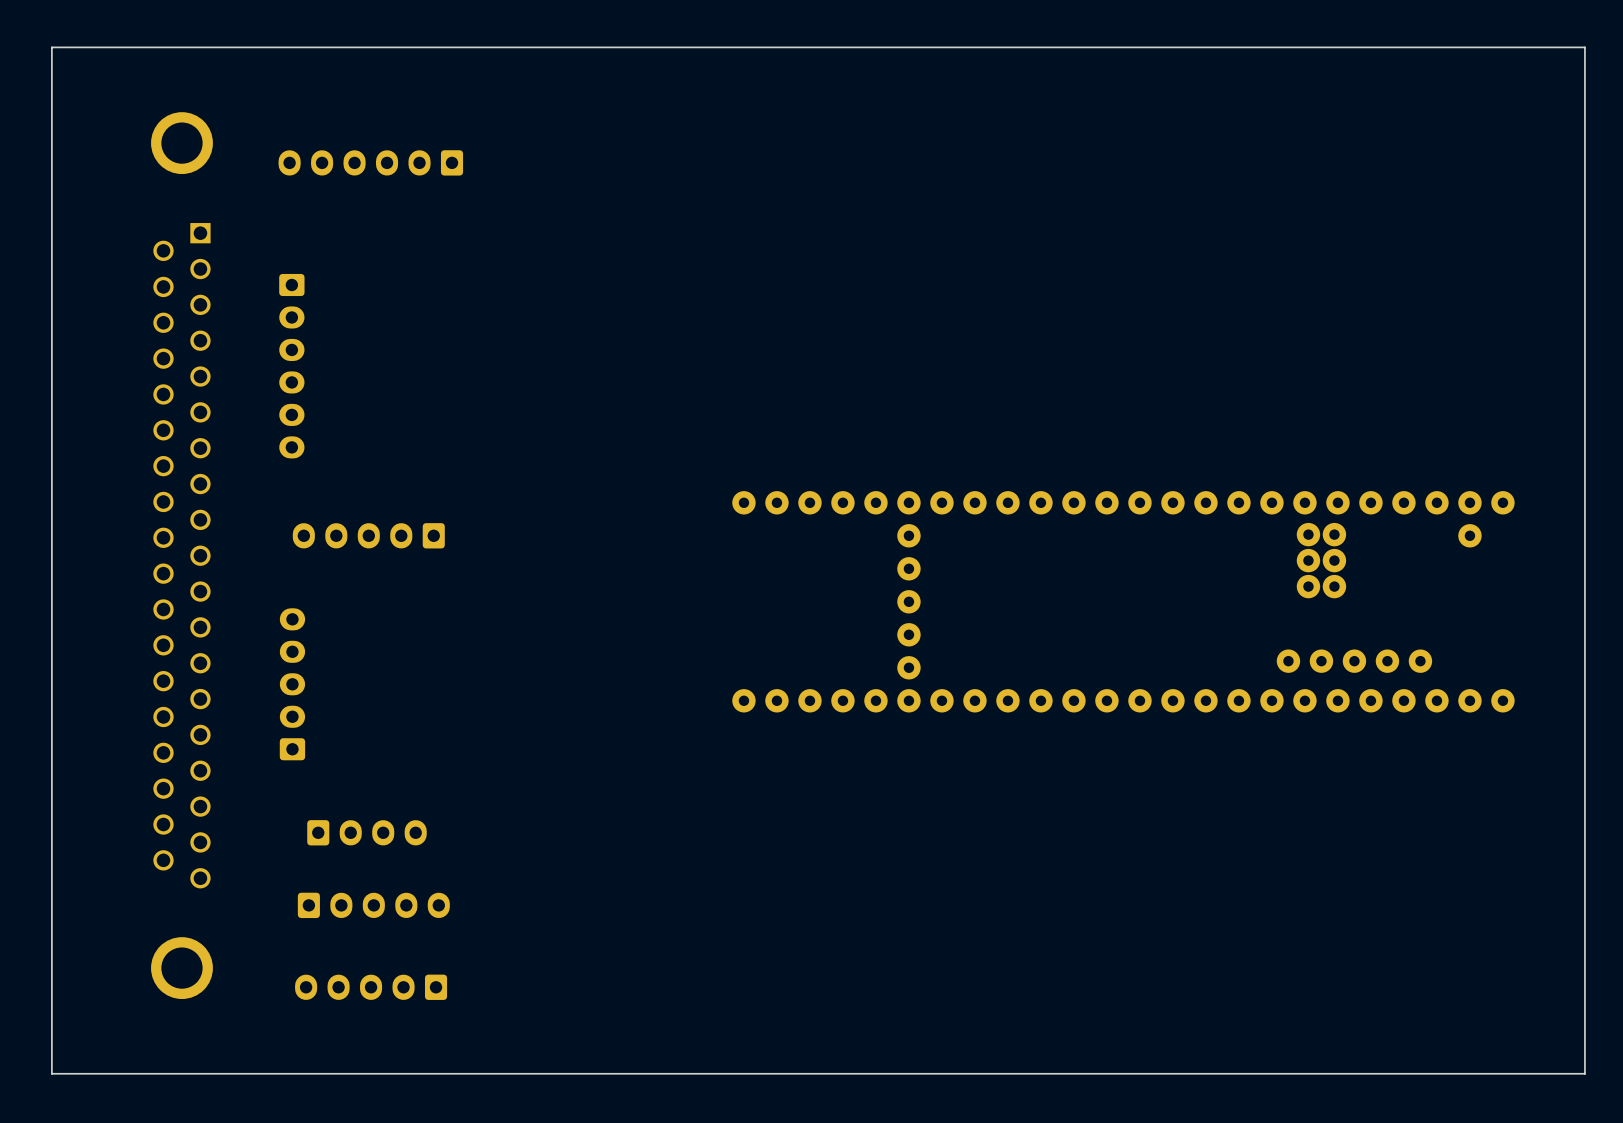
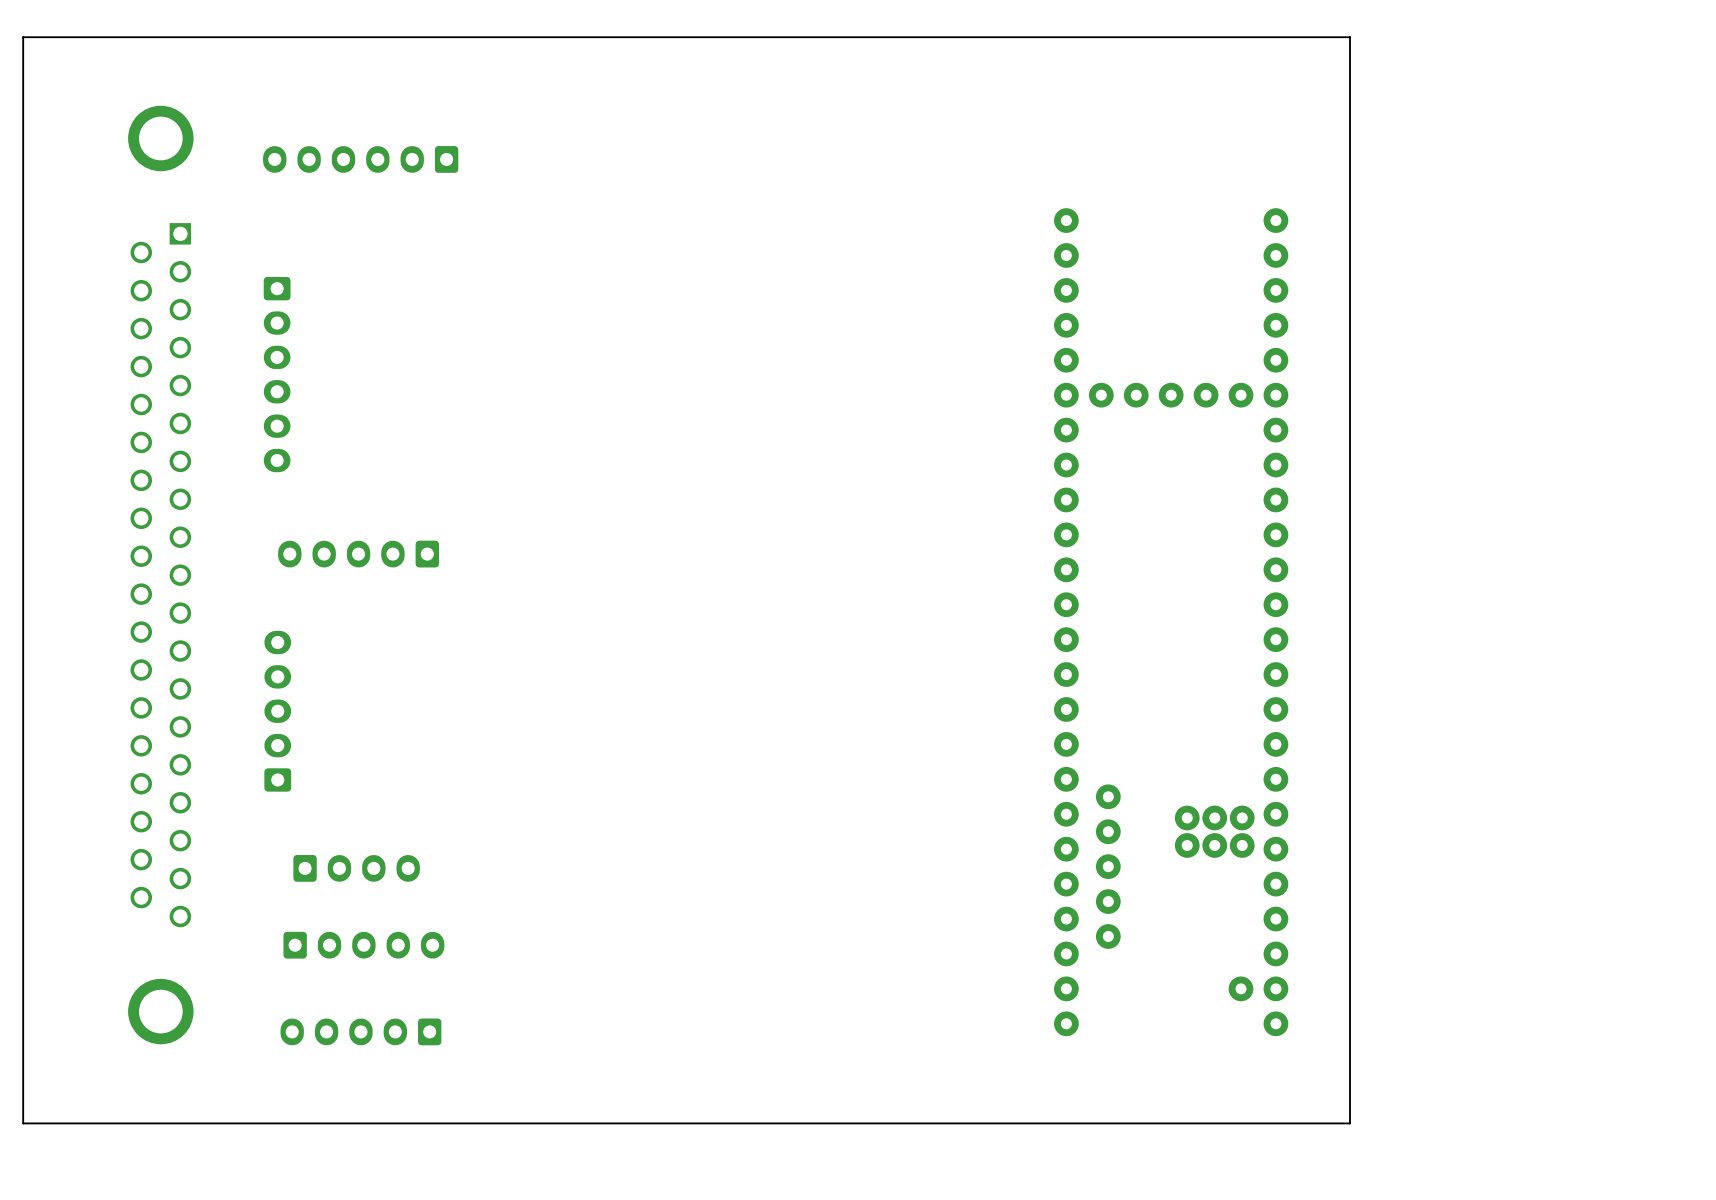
board edge: (1305, 47) (1584, 47) (1584, 1073) (1305, 1073) -> (1349, 37) (1349, 1123)
part rotation: 0° (1123, 601) -> 90° clockwise (1171, 622)

